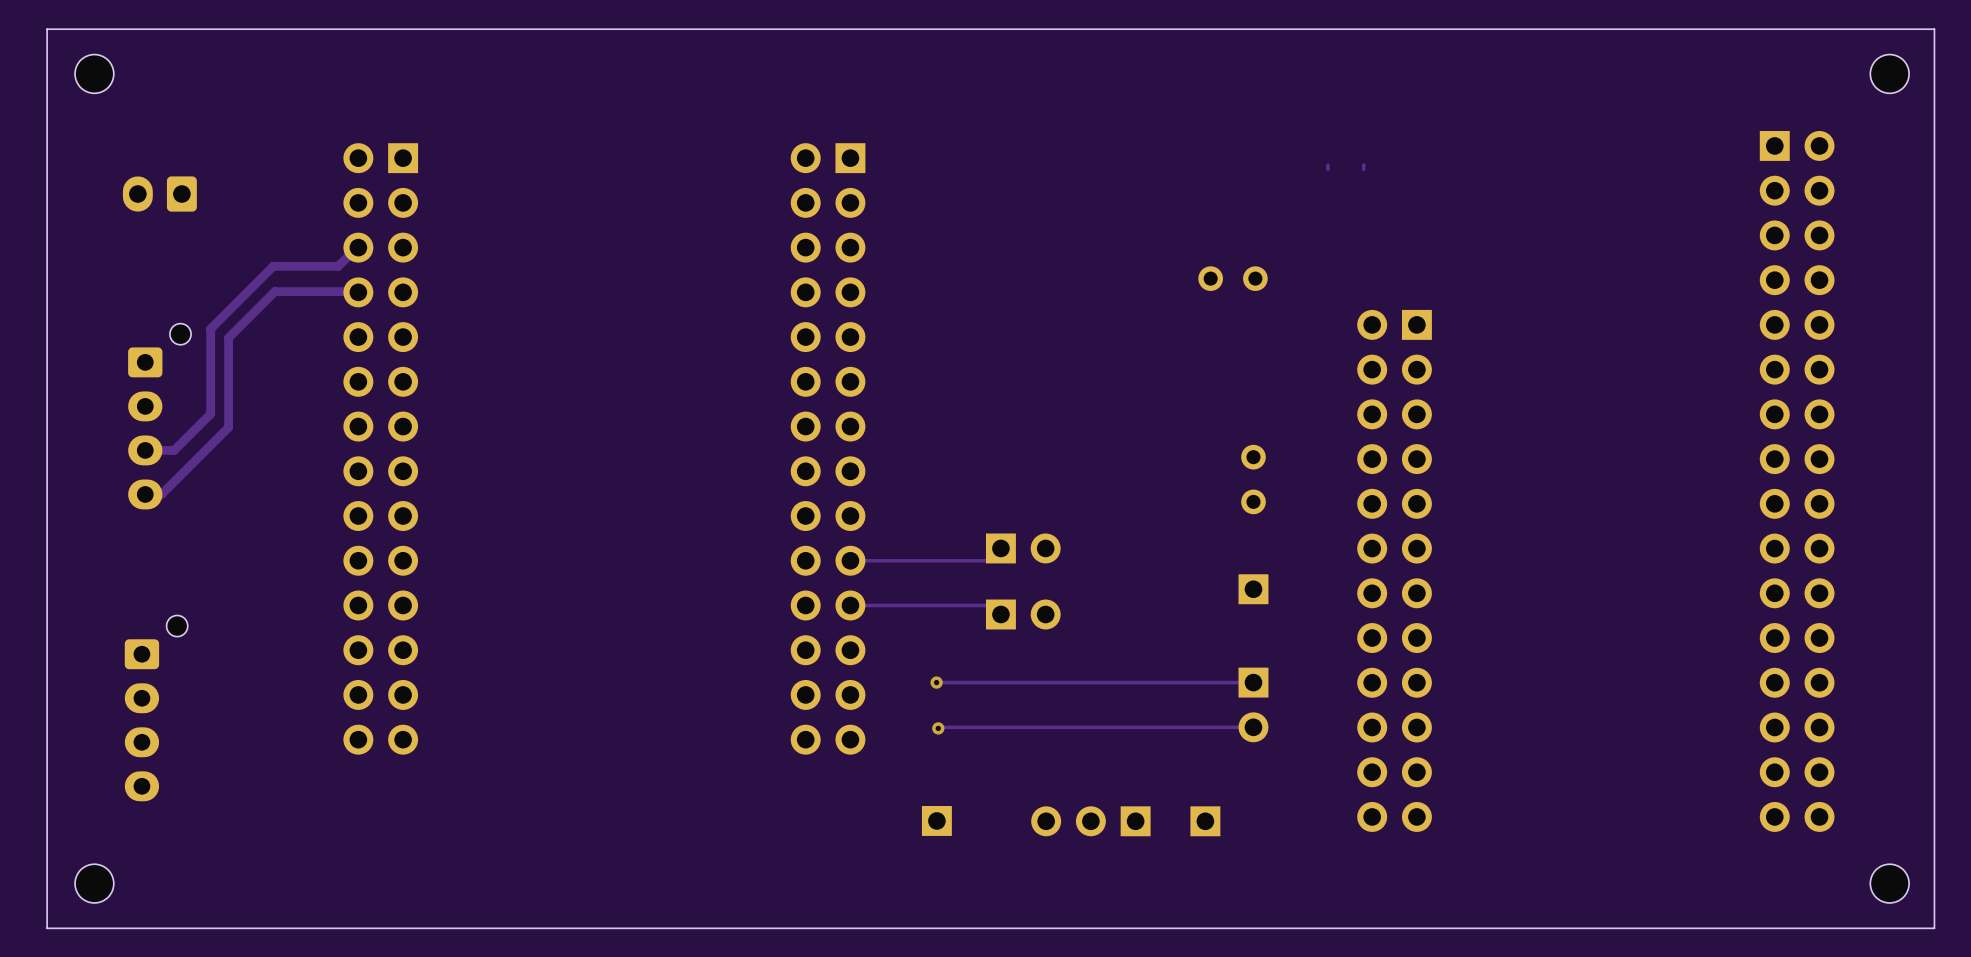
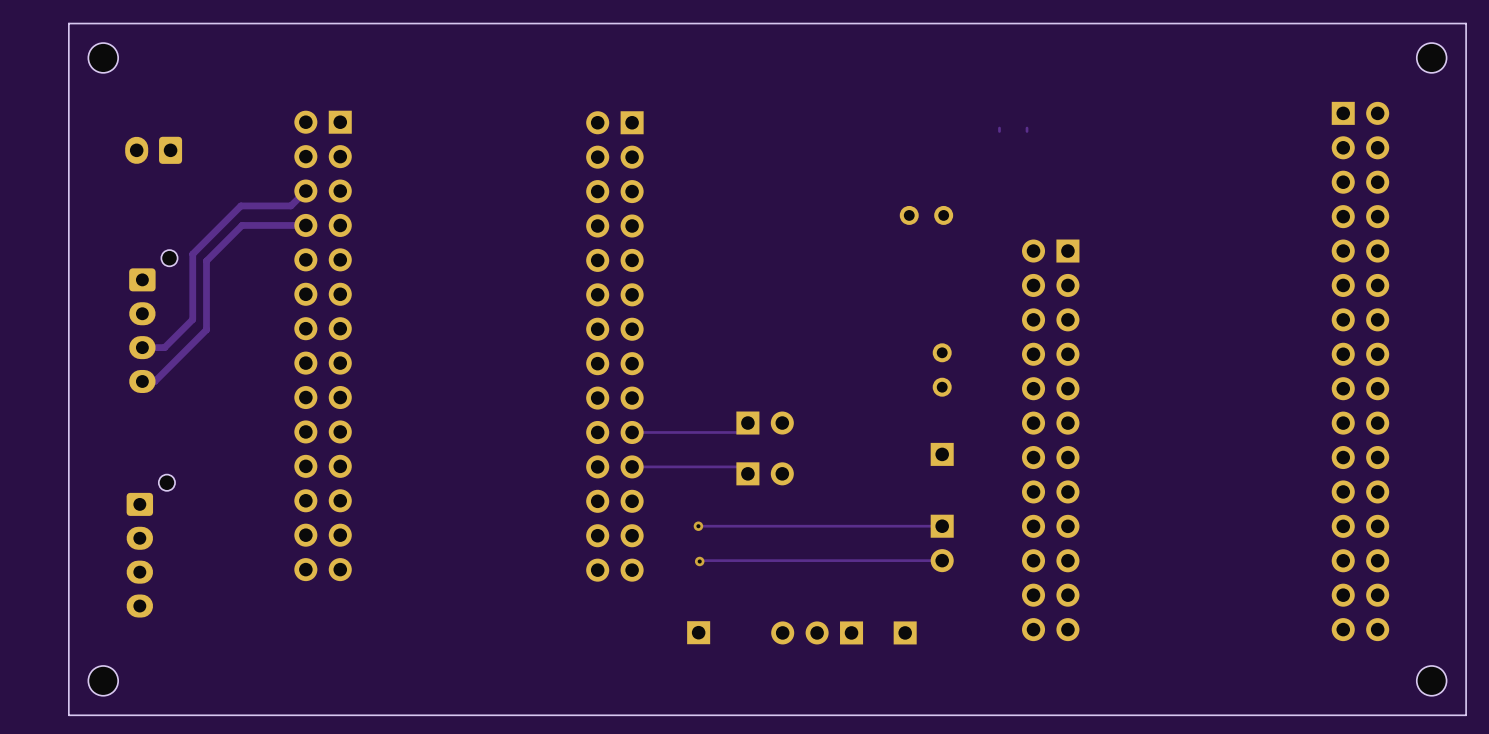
board edge: (118, 29) (47, 29) (47, 928) (118, 928) -> (68, 23) (68, 715)
part position: (94, 73) -> (103, 57)
part position: (159, 194) -> (153, 150)
track: (357, 246) (338, 266) (273, 266) (210, 328) (210, 413) (174, 450) (145, 450) -> (305, 191) (290, 205) (240, 205) (192, 254) (192, 319) (164, 347) (142, 347)
track: (343, 291) (274, 291) (228, 337) (228, 427) (161, 494) (145, 494) (154, 494) -> (242, 225) (206, 261) (206, 329) (154, 381) (142, 381) (149, 381)
track: none -> (305, 225) (253, 225)
part position: (159, 416) -> (153, 321)
part position: (380, 448) -> (323, 345)
part position: (156, 708) -> (150, 546)
part position: (94, 883) -> (103, 680)

